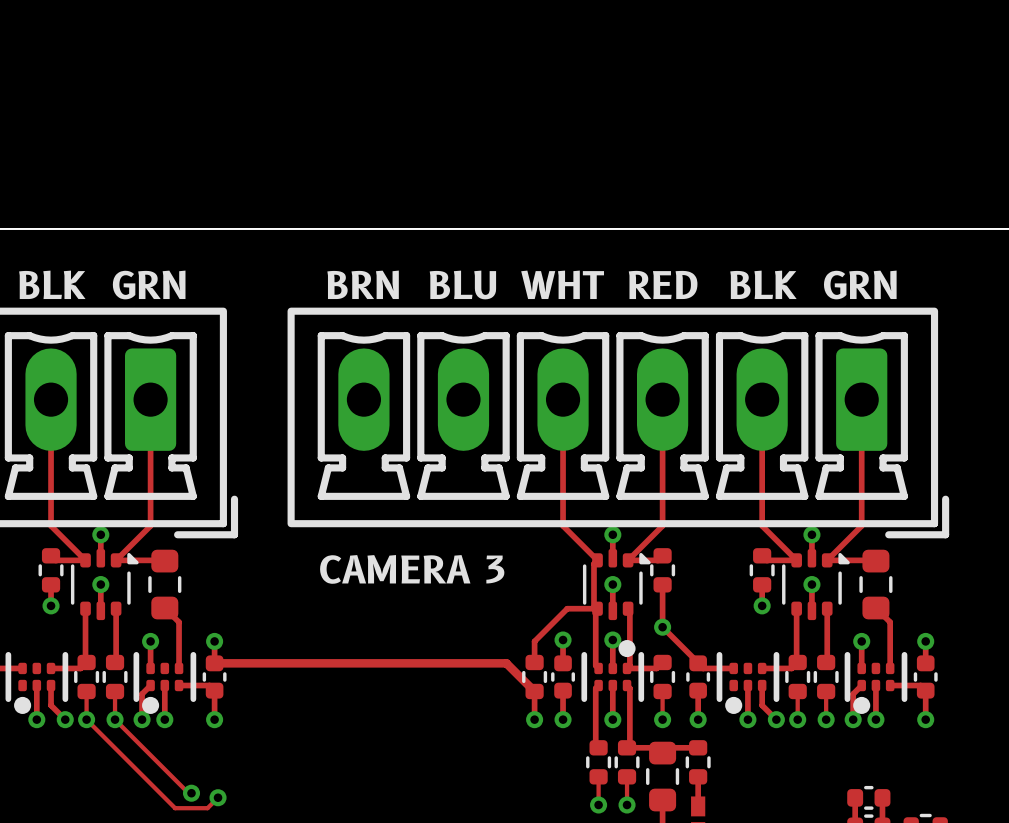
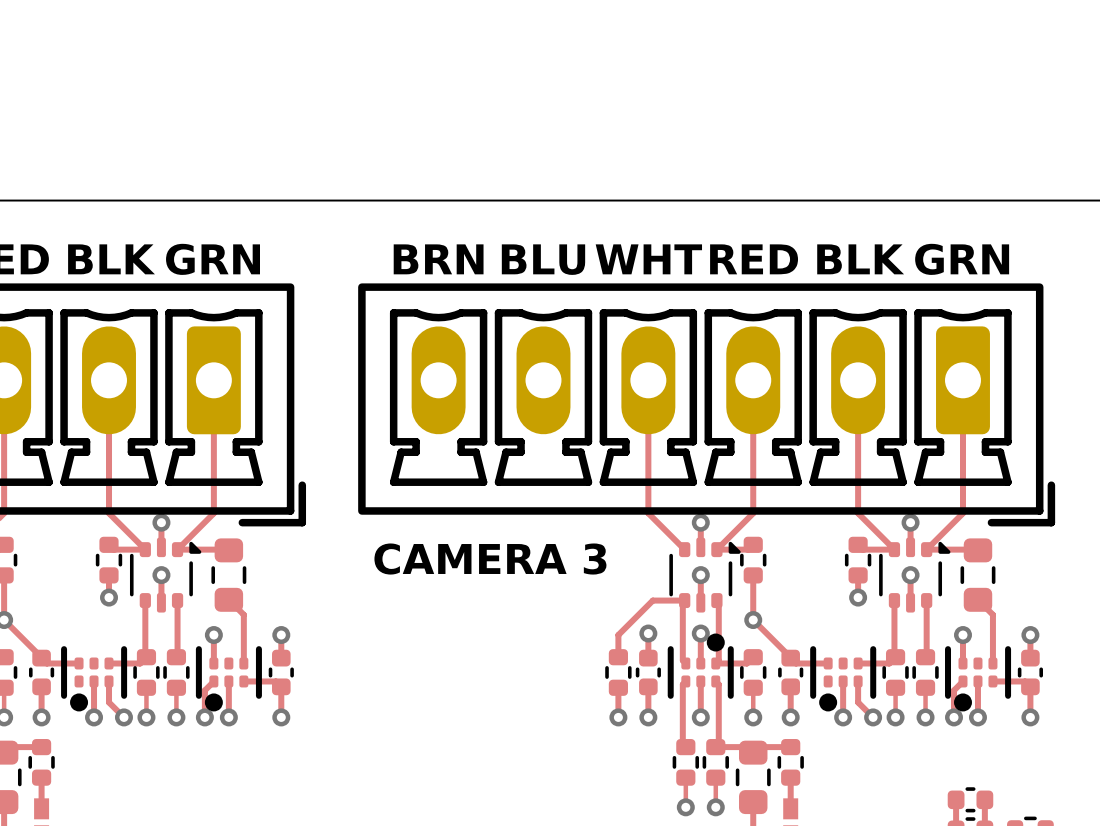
track: (563, 525) (597, 560) (593, 563) (593, 608) (595, 610) (597, 608) -> (648, 513) (684, 549)
track: (214, 663) (506, 663) (534, 691) -> none
track: (86, 719) (175, 808) (207, 808) (218, 797) -> none
track: (115, 719) (188, 793) (191, 793) -> none
via: (191, 793) -> none
via: (218, 797) -> none

